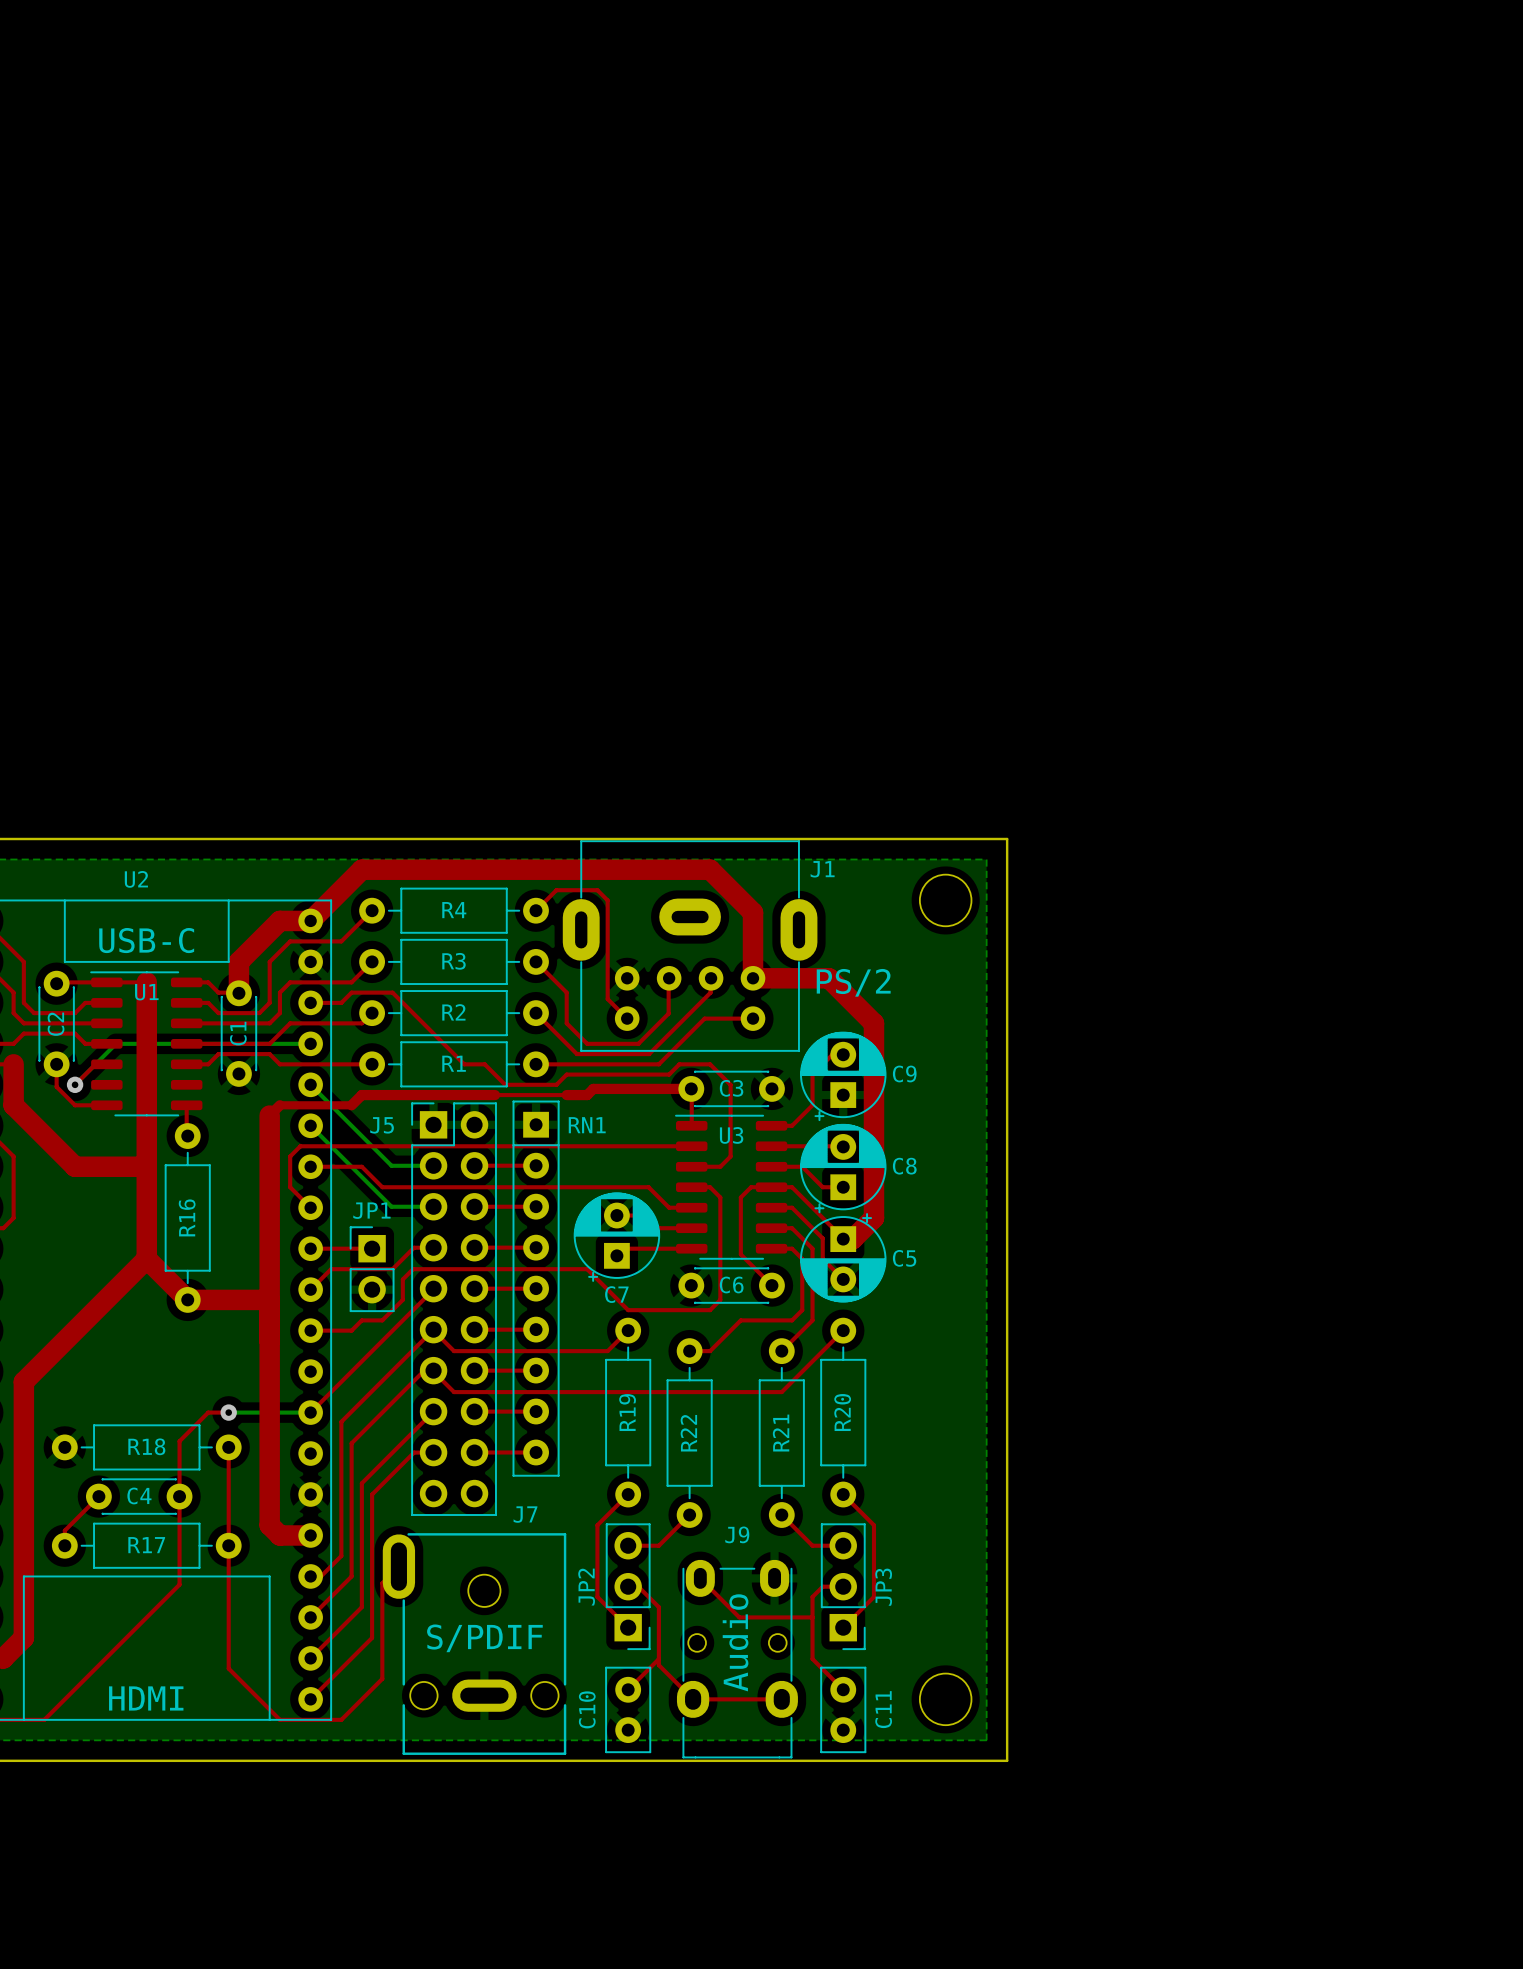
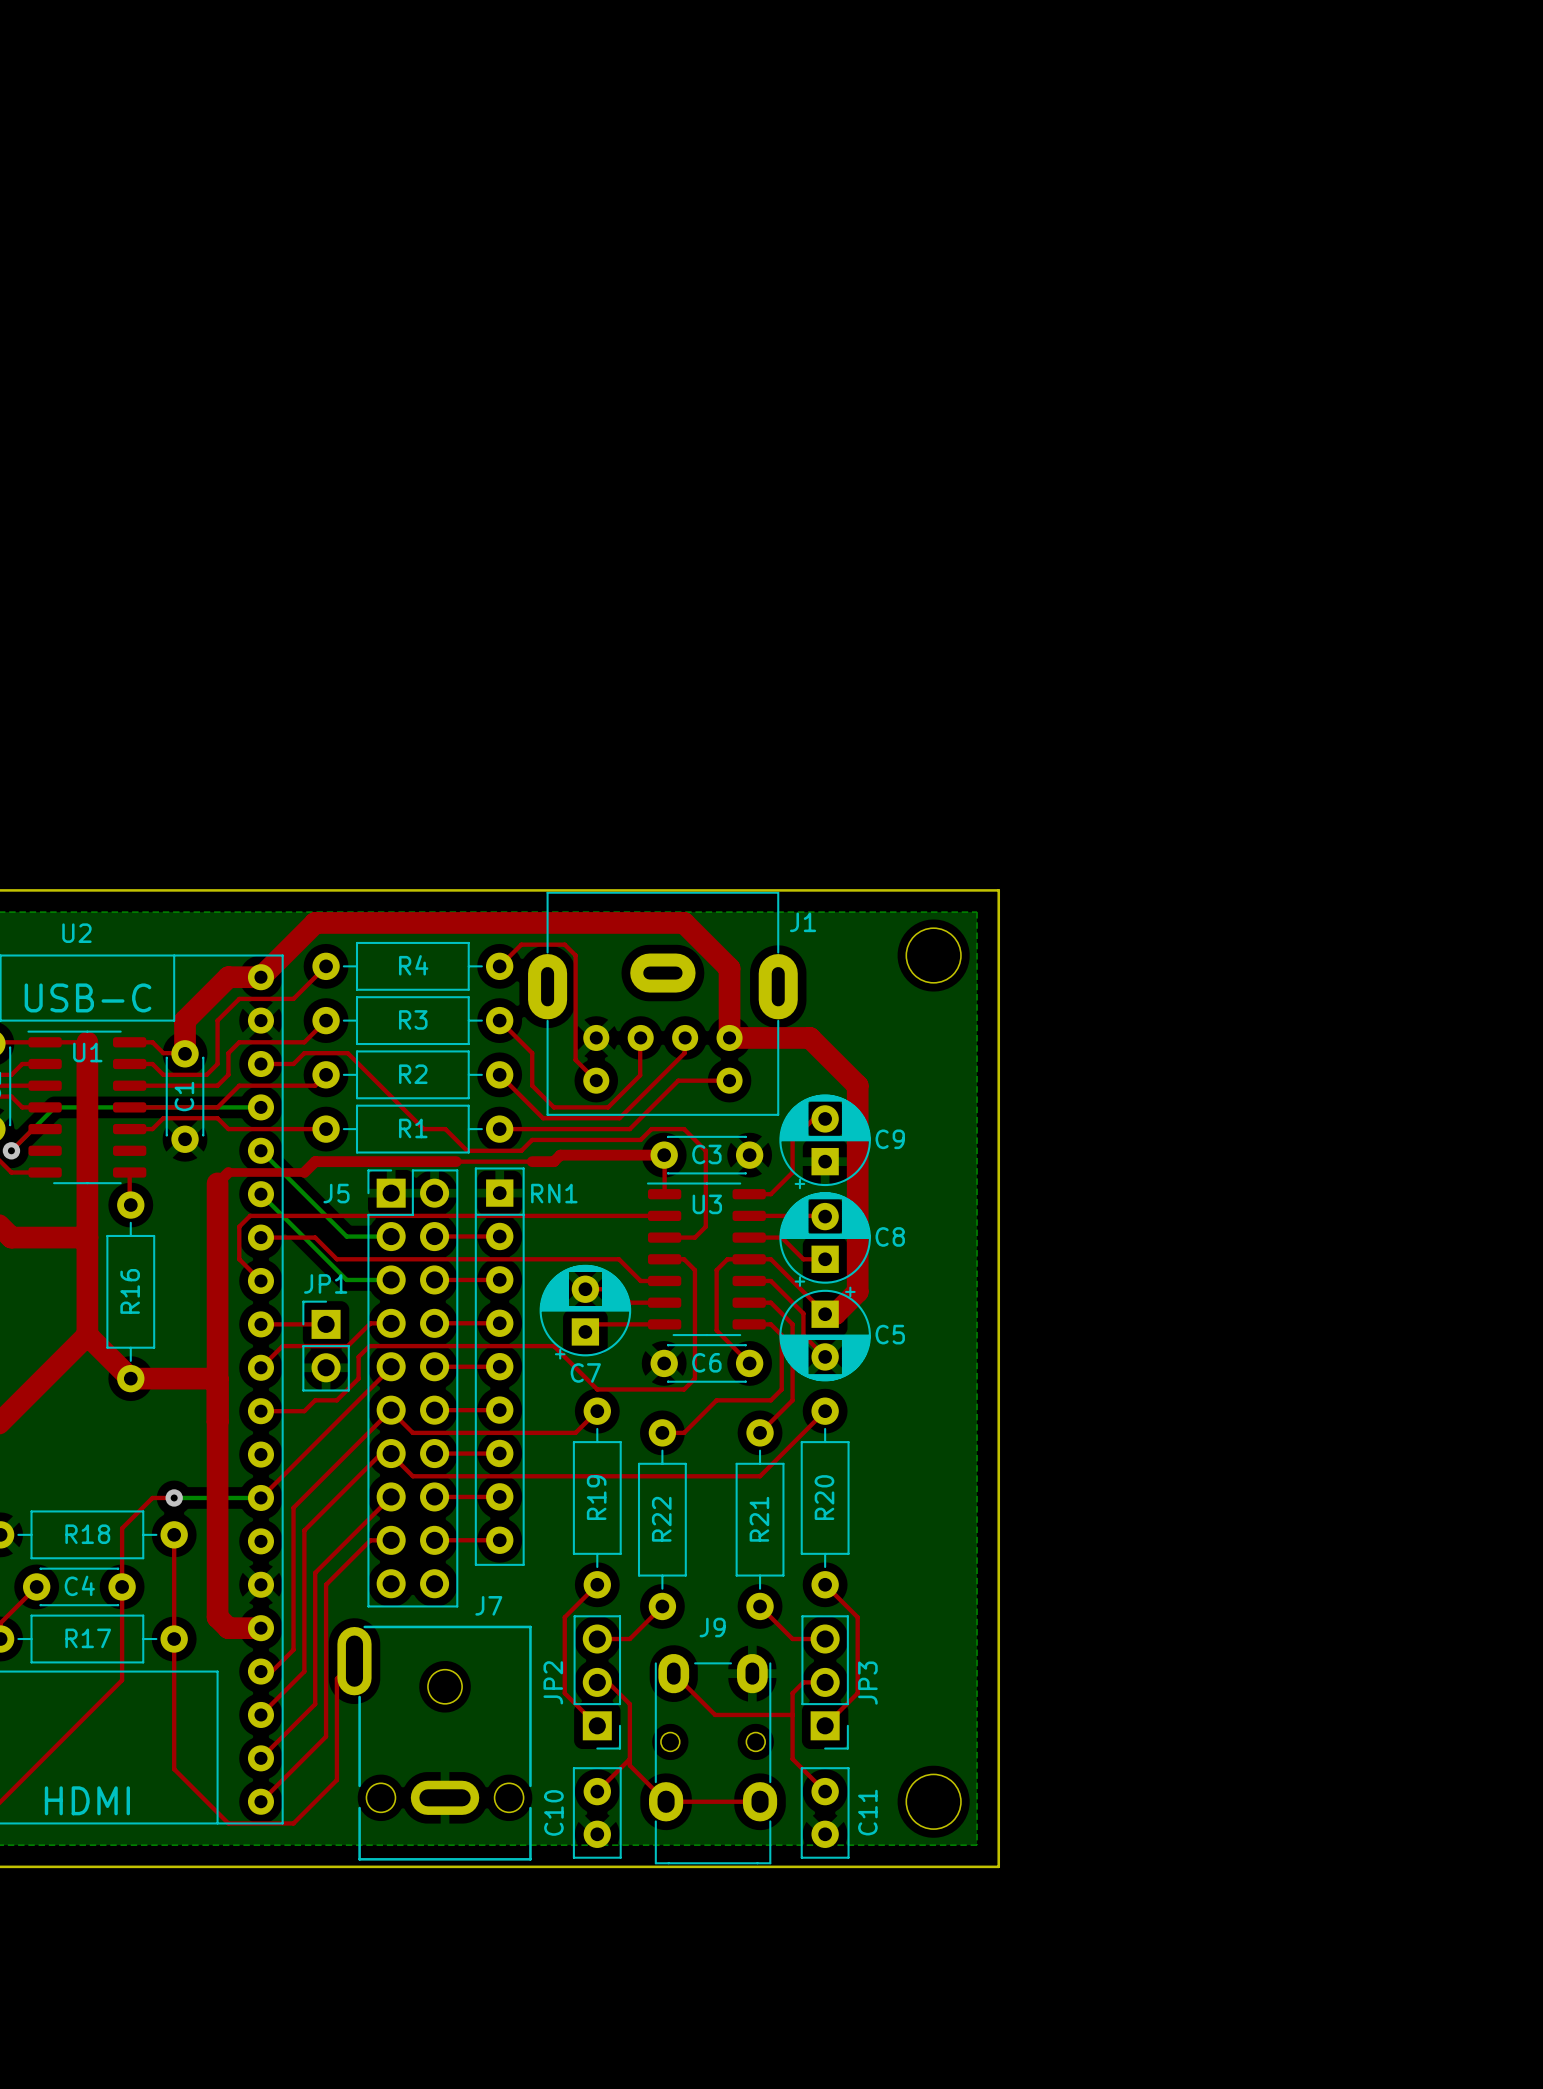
text: PS/2 (853, 982) -> none
text: S/PDIF (484, 1638) -> none
text: Audio (735, 1642) -> none

